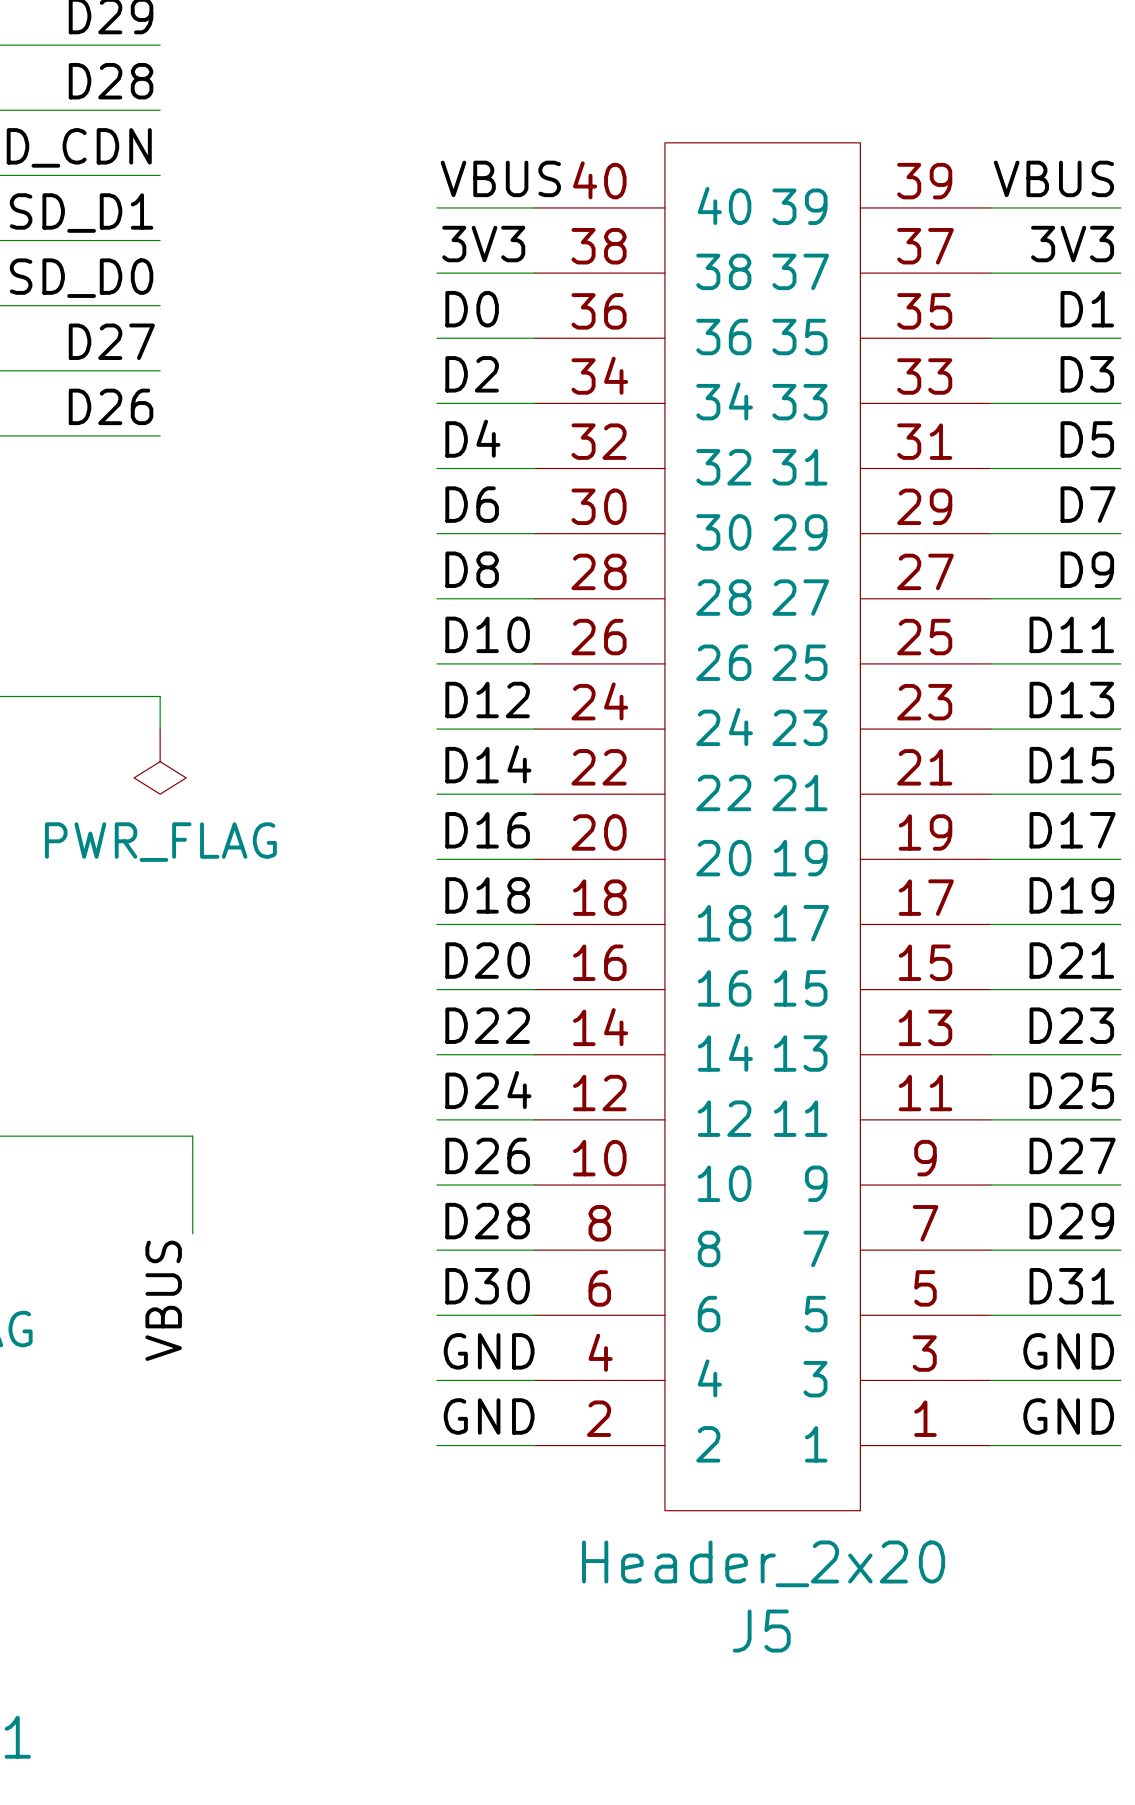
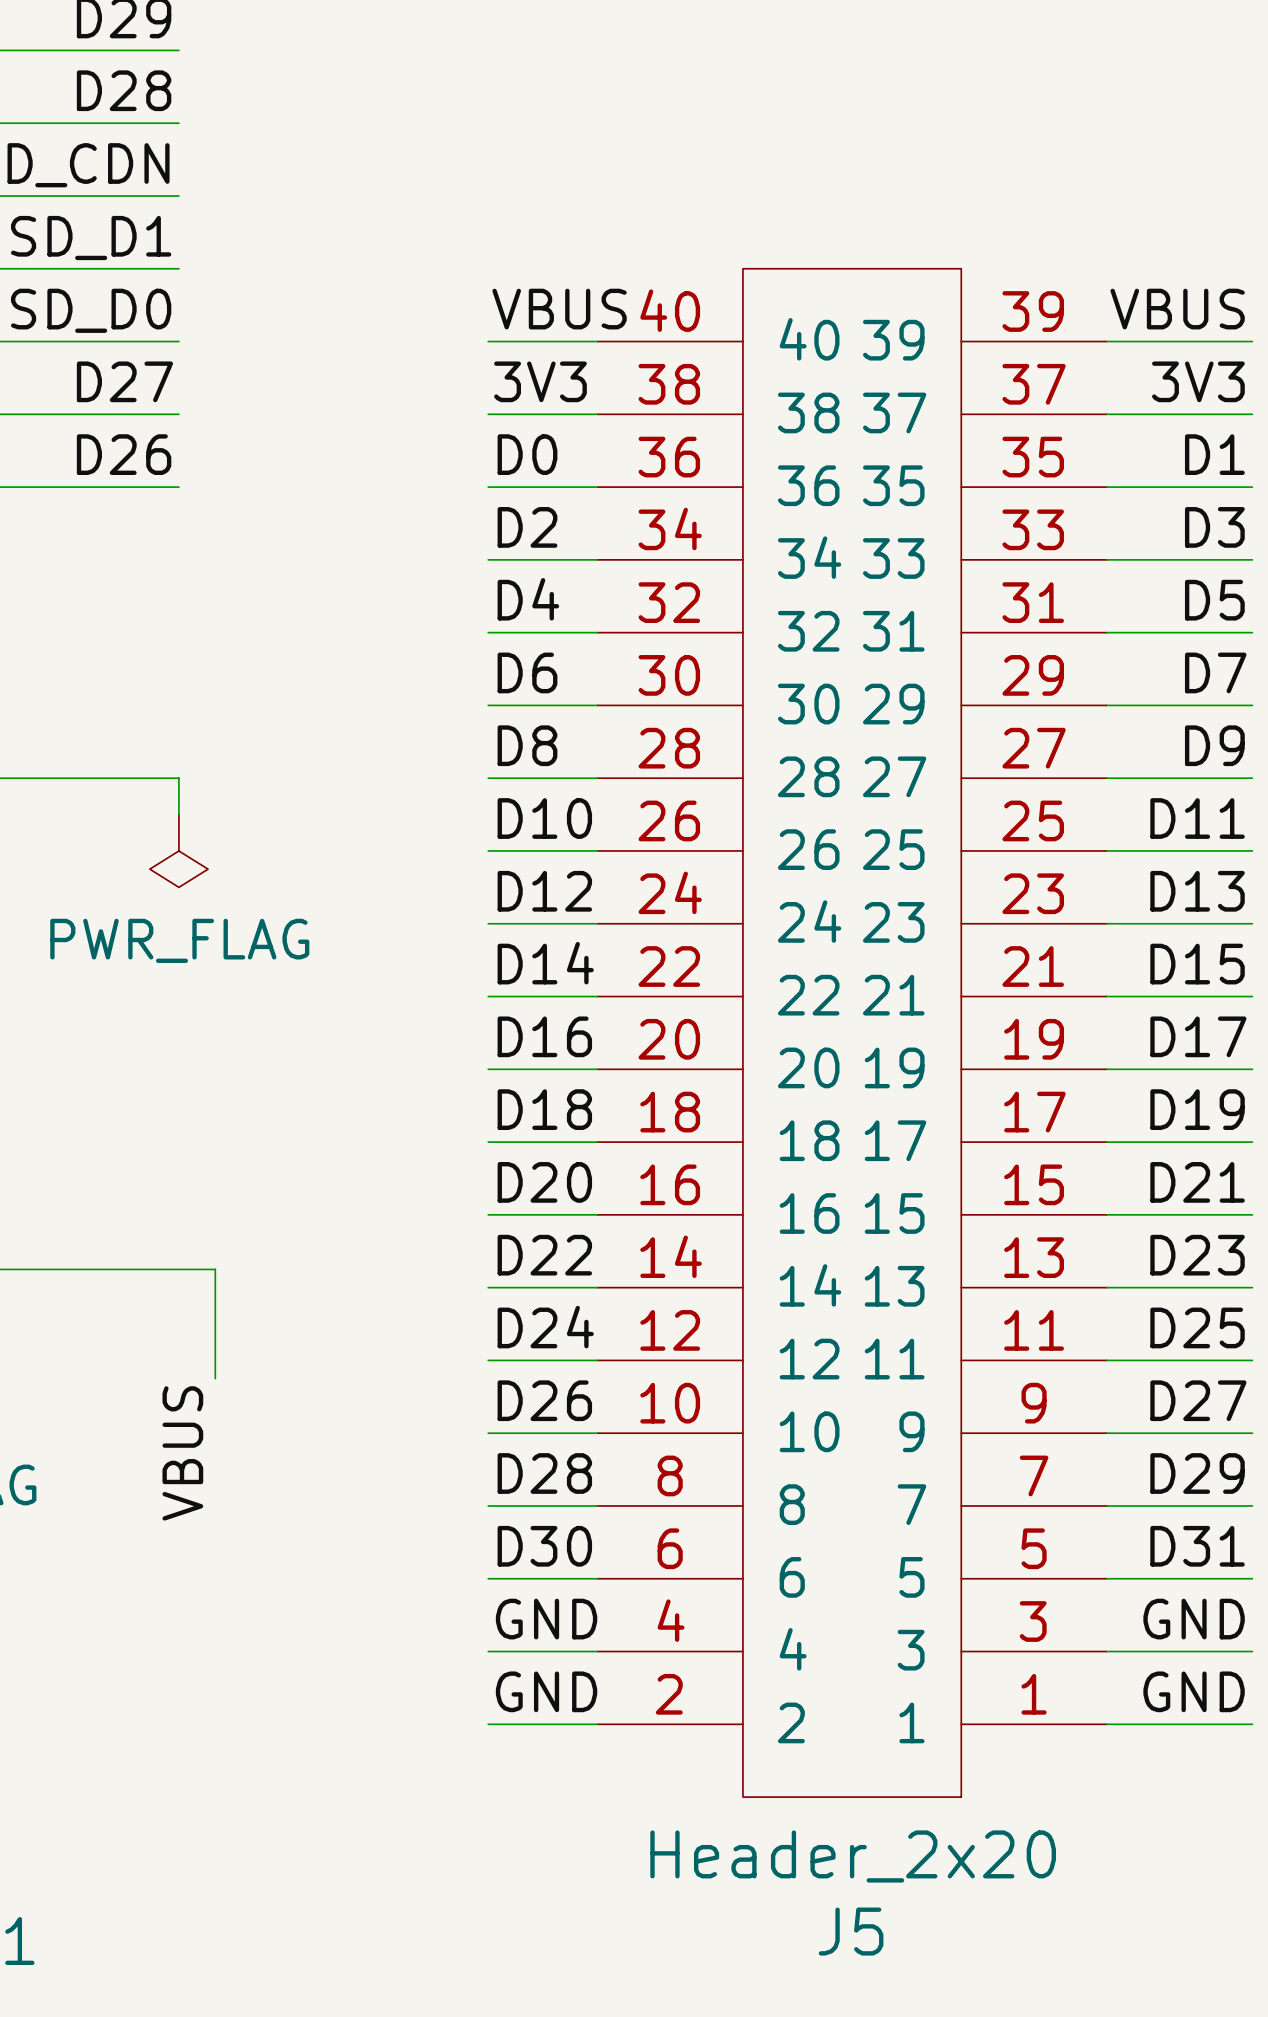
label position: VBUS (500, 178) -> VBUS (559, 309)
label position: VBUS (1053, 178) -> VBUS (1177, 309)
wire: (436, 207) (534, 207) -> (488, 341) (597, 341)
wire: (990, 207) (1120, 207) -> (1106, 341) (1252, 341)
label position: 3V3 (483, 244) -> 3V3 (540, 381)
label position: 3V3 (1072, 244) -> 3V3 (1198, 381)
wire: (436, 273) (534, 273) -> (488, 414) (597, 414)
wire: (990, 273) (1120, 273) -> (1106, 414) (1252, 414)
label position: D0 (472, 309) -> D0 (527, 454)
label position: D1 (1087, 309) -> D1 (1214, 454)
wire: (436, 338) (534, 338) -> (488, 487) (597, 487)
wire: (990, 338) (1120, 338) -> (1106, 487) (1252, 487)
label position: D2 (472, 374) -> D2 (527, 527)
label position: D3 (1087, 374) -> D3 (1214, 527)
wire: (436, 403) (534, 403) -> (488, 559) (597, 559)
wire: (990, 403) (1120, 403) -> (1106, 559) (1252, 559)
label position: D4 (472, 438) -> D4 (528, 599)
label position: D5 (1087, 439) -> D5 (1214, 600)
wire: (436, 468) (534, 468) -> (488, 632) (597, 632)
wire: (990, 468) (1120, 468) -> (1106, 632) (1252, 632)
label position: D6 (472, 504) -> D6 (527, 672)
label position: D7 (1088, 504) -> D7 (1215, 672)
wire: (436, 533) (534, 533) -> (488, 705) (597, 705)
wire: (990, 533) (1120, 533) -> (1106, 705) (1252, 705)
label position: D8 (472, 569) -> D8 (527, 745)
label position: D9 (1087, 569) -> D9 (1214, 745)
wire: (436, 598) (534, 598) -> (488, 778) (597, 778)
wire: (990, 598) (1120, 598) -> (1106, 778) (1252, 778)
label position: D10 (487, 634) -> D10 (544, 818)
label position: D11 (1071, 634) -> D11 (1197, 818)
wire: (436, 663) (534, 663) -> (488, 850) (597, 850)
wire: (990, 663) (1120, 663) -> (1106, 850) (1252, 850)
label position: D12 (487, 700) -> D12 (544, 891)
label position: D13 (1071, 700) -> D13 (1197, 891)
wire: (436, 729) (534, 729) -> (488, 923) (597, 923)
wire: (990, 729) (1120, 729) -> (1106, 923) (1252, 923)
label position: D14 (488, 764) -> D14 (545, 963)
label position: D15 (1071, 765) -> D15 (1197, 964)
wire: (436, 794) (534, 794) -> (488, 996) (597, 996)
wire: (990, 794) (1120, 794) -> (1106, 996) (1252, 996)
J5 position: (762, 826) -> (852, 1032)
label position: D16 (487, 830) -> D16 (544, 1036)
label position: D17 (1072, 830) -> D17 (1198, 1036)
wire: (436, 859) (534, 859) -> (488, 1069) (597, 1069)
wire: (990, 859) (1120, 859) -> (1106, 1069) (1252, 1069)
label position: D18 (487, 895) -> D18 (544, 1109)
label position: D19 (1071, 895) -> D19 (1197, 1109)
wire: (436, 924) (534, 924) -> (488, 1142) (597, 1142)
wire: (990, 924) (1120, 924) -> (1106, 1142) (1252, 1142)
label position: D20 (487, 960) -> D20 (544, 1182)
label position: D21 (1071, 960) -> D21 (1197, 1182)
wire: (436, 989) (534, 989) -> (488, 1214) (597, 1214)
wire: (990, 989) (1120, 989) -> (1106, 1214) (1252, 1214)
label position: D22 (487, 1025) -> D22 (544, 1255)
label position: D23 (1071, 1025) -> D23 (1197, 1255)
wire: (436, 1054) (534, 1054) -> (488, 1287) (597, 1287)
wire: (990, 1054) (1120, 1054) -> (1106, 1287) (1252, 1287)
label position: D24 (488, 1090) -> D24 (545, 1327)
label position: D25 (1071, 1090) -> D25 (1197, 1327)
wire: (436, 1119) (534, 1119) -> (488, 1360) (597, 1360)
wire: (990, 1119) (1120, 1119) -> (1106, 1360) (1252, 1360)
label position: D26 (487, 1155) -> D26 (544, 1400)
label position: D27 (1072, 1155) -> D27 (1198, 1400)
wire: (436, 1185) (534, 1185) -> (488, 1433) (597, 1433)
wire: (990, 1185) (1120, 1185) -> (1106, 1433) (1252, 1433)
label position: D28 (487, 1221) -> D28 (544, 1473)
label position: D29 (1071, 1221) -> D29 (1197, 1473)
wire: (436, 1250) (534, 1250) -> (488, 1505) (597, 1505)
wire: (990, 1250) (1120, 1250) -> (1106, 1505) (1252, 1505)
label position: D30 (487, 1286) -> D30 (544, 1546)
label position: D31 (1071, 1286) -> D31 (1197, 1546)
wire: (436, 1315) (534, 1315) -> (488, 1578) (597, 1578)
wire: (990, 1315) (1120, 1315) -> (1106, 1578) (1252, 1578)
label: GND (489, 1351) -> none
label: GND (1068, 1351) -> none
wire: (436, 1380) (534, 1380) -> (488, 1651) (597, 1651)
wire: (990, 1380) (1120, 1380) -> (1106, 1651) (1252, 1651)
label position: GND (489, 1416) -> GND (546, 1619)
label position: GND (1068, 1416) -> GND (1194, 1619)
wire: (436, 1445) (534, 1445) -> (488, 1724) (597, 1724)
wire: (990, 1445) (1120, 1445) -> (1106, 1724) (1252, 1724)
label: none -> GND (546, 1691)
label: none -> GND (1194, 1691)

